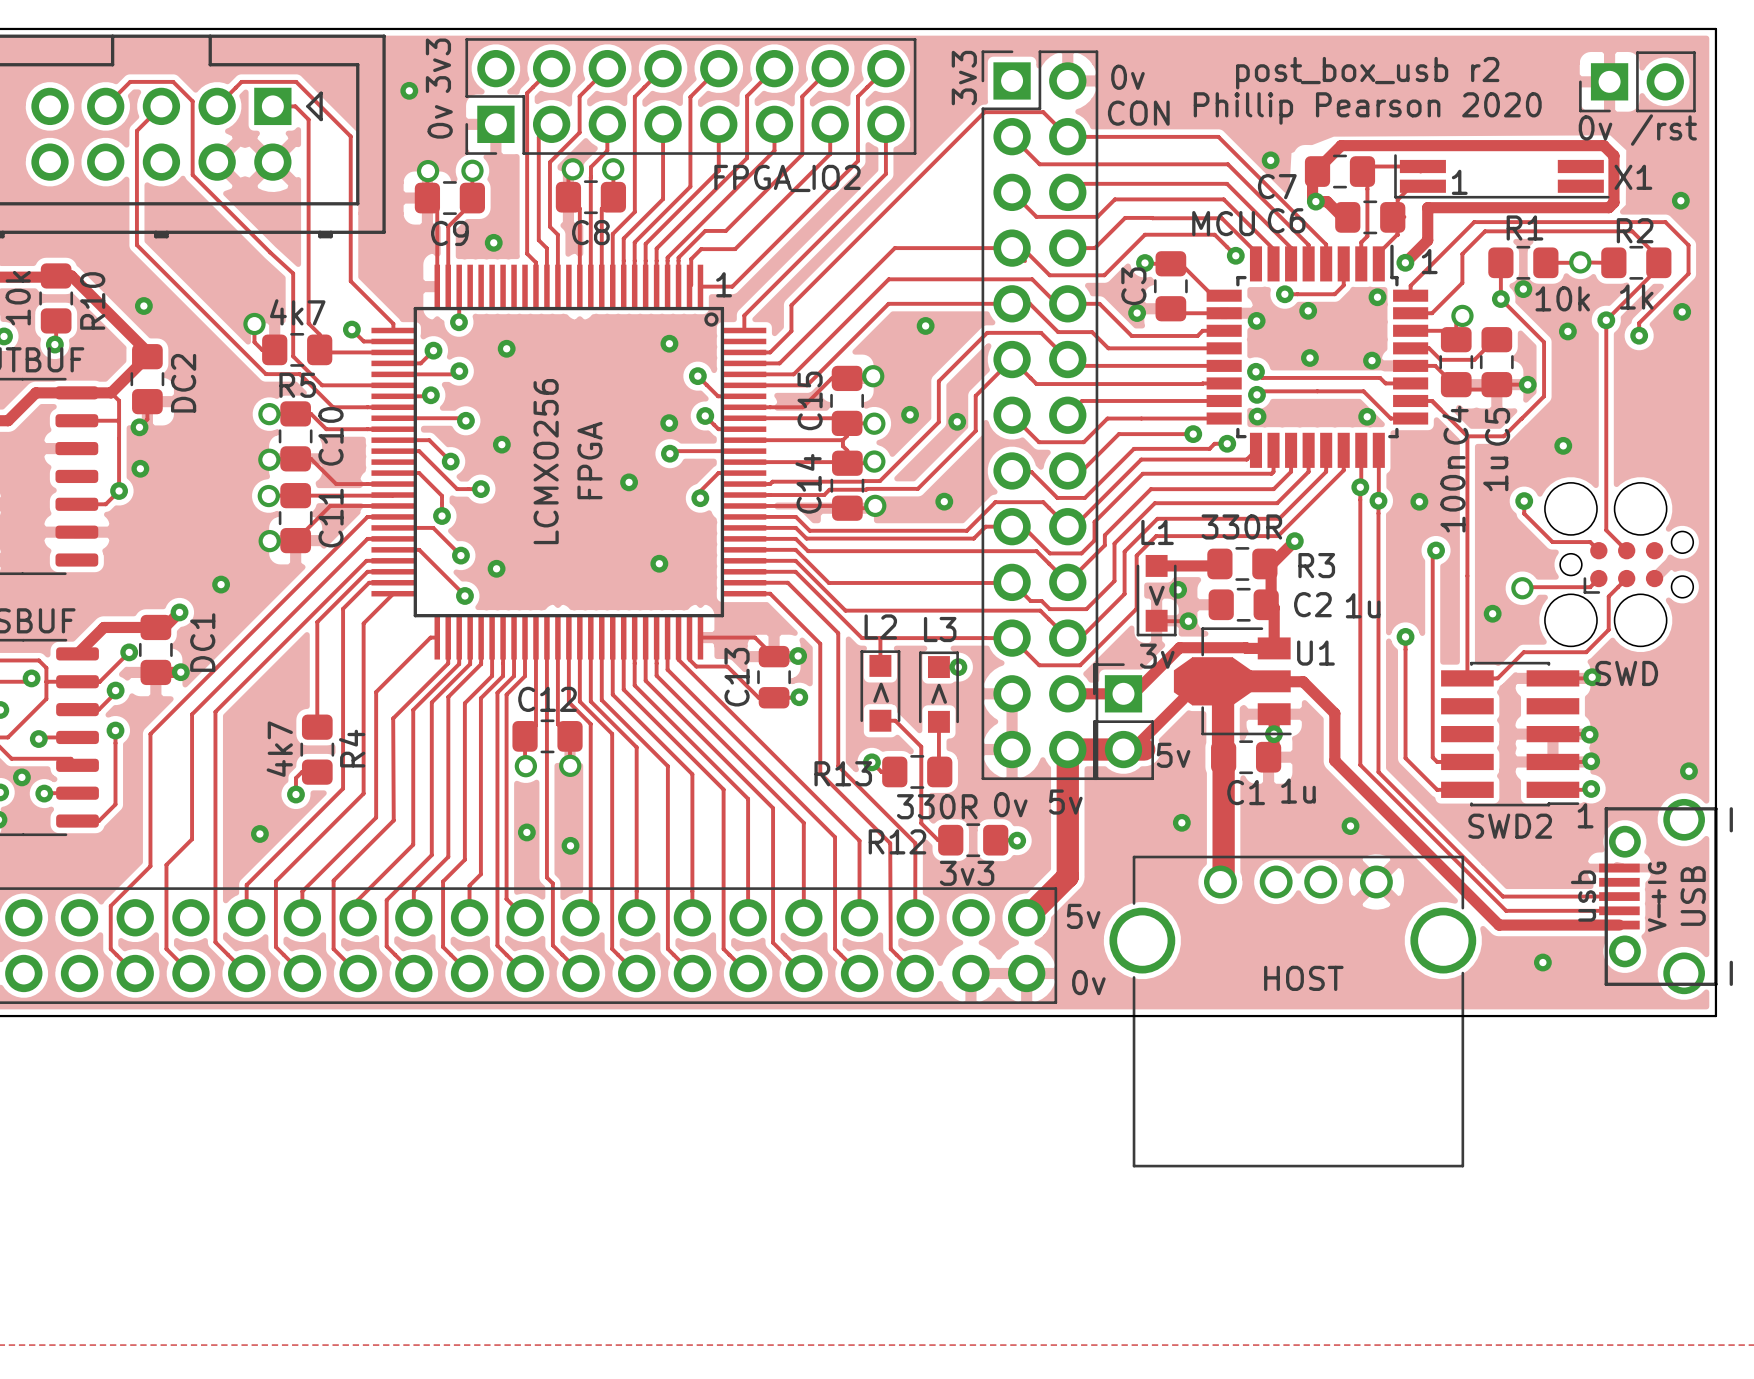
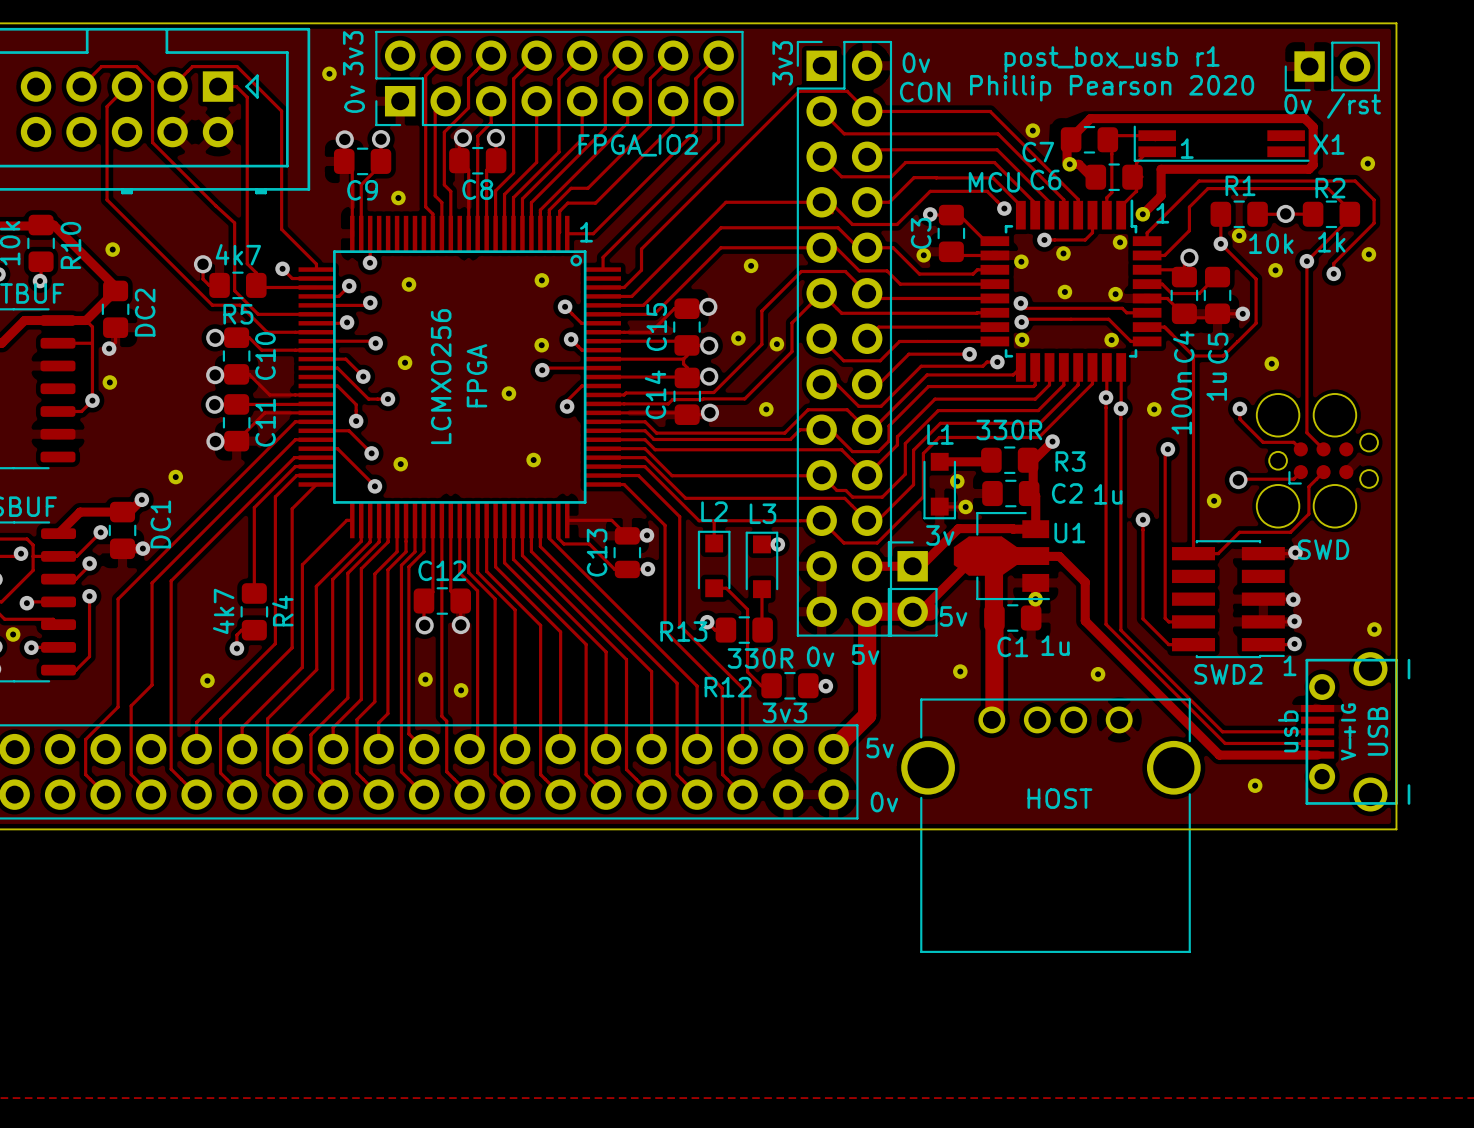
text: post_box_usb r2 (1367, 73) -> post_box_usb r1 (1112, 59)
text: > (1156, 595) -> none
text: > (881, 692) -> none
text: > (939, 693) -> none

